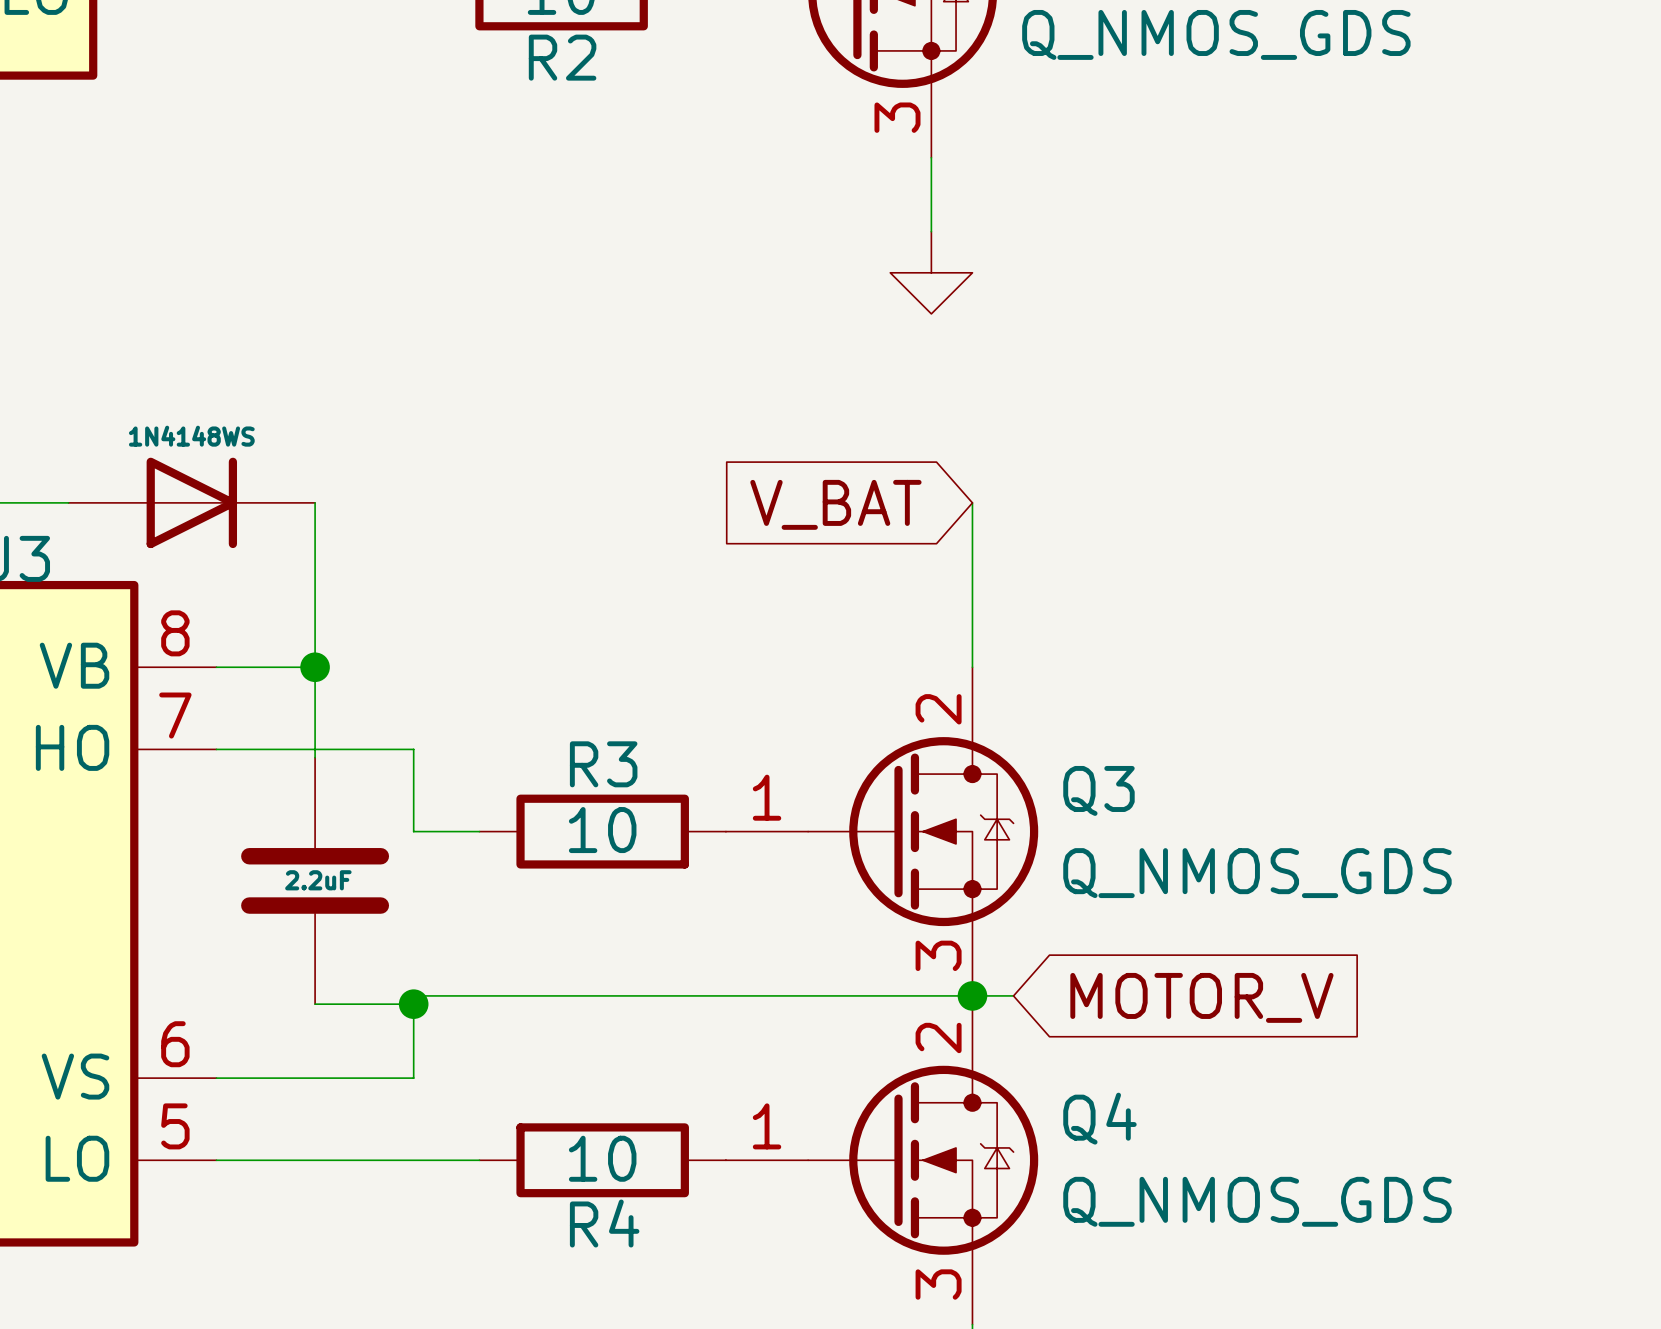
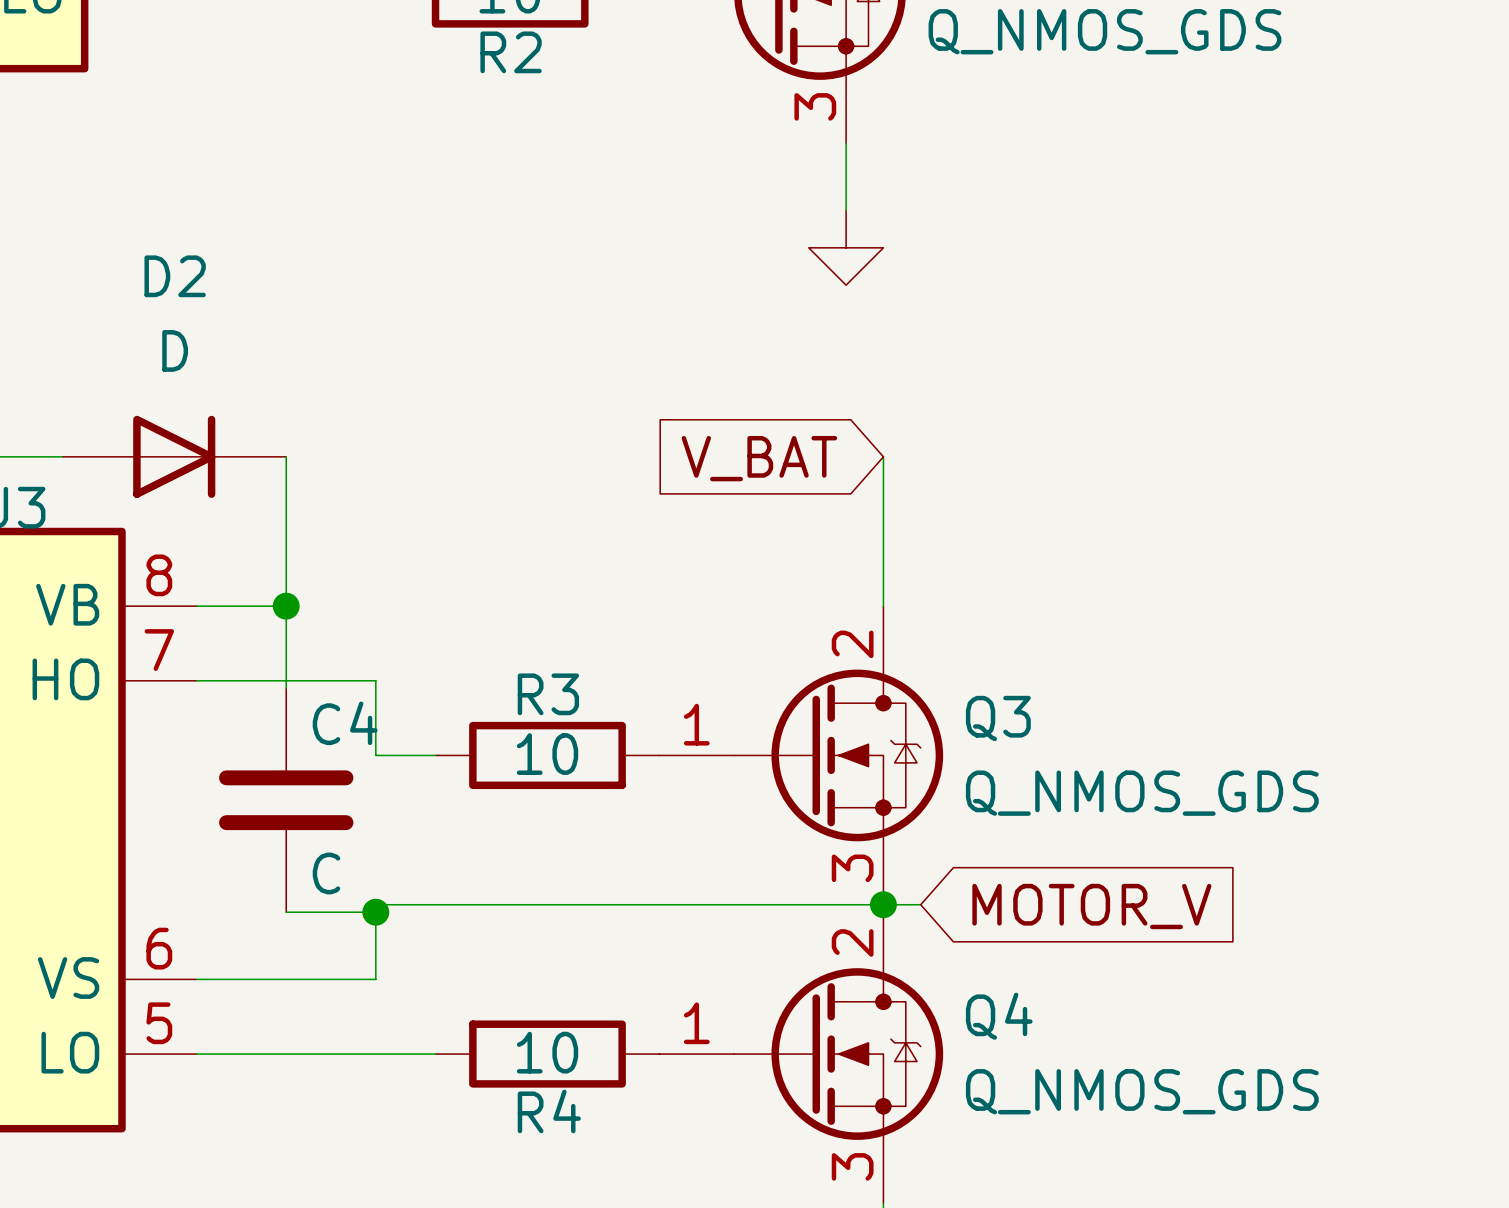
D2 name: none -> D2 (175, 276)
D2 value: 1N4148WS (191, 436) -> D (175, 350)
C4 name: none -> C4 (345, 723)
C4 value: 2.2uF (318, 880) -> C (326, 873)

